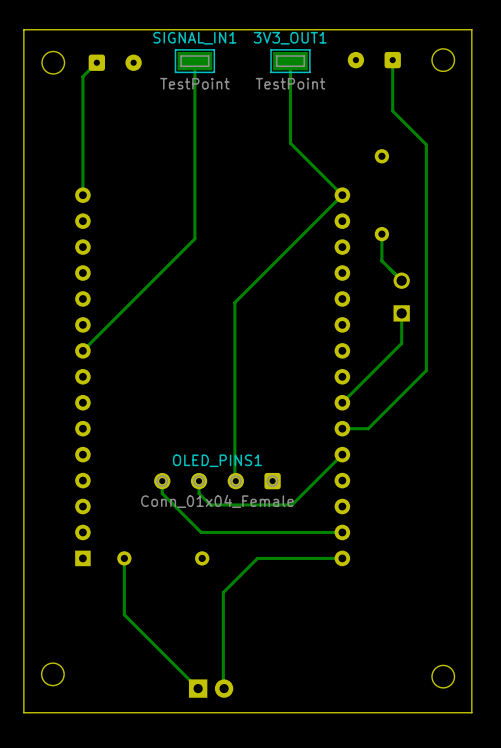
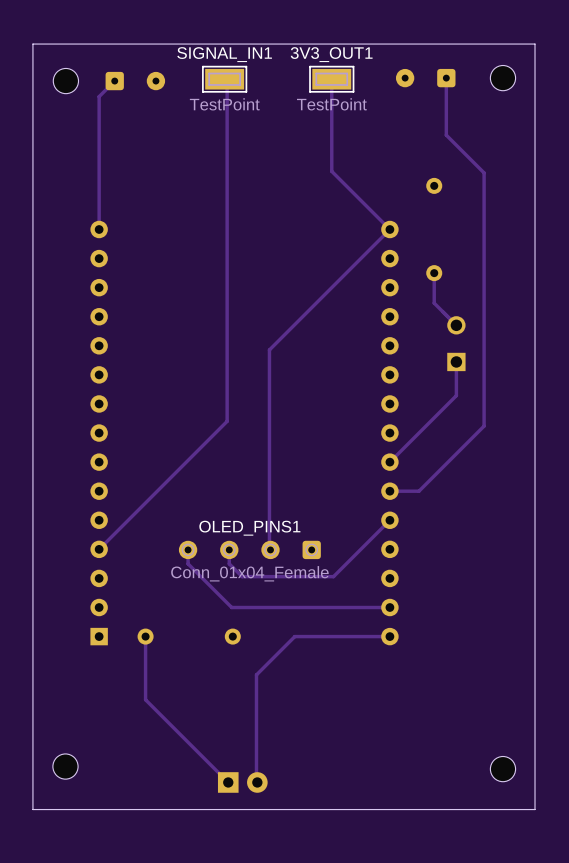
track: (194, 61) (194, 238) (82, 350) -> (224, 79) (227, 81) (227, 421) (99, 549)

